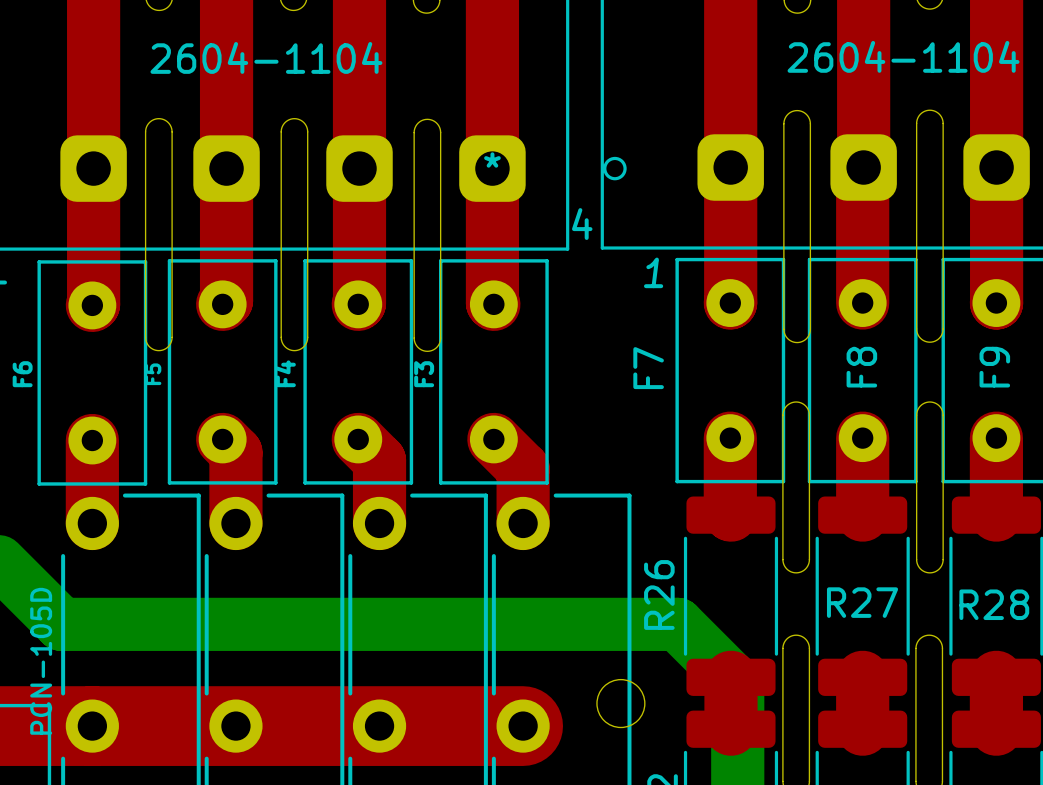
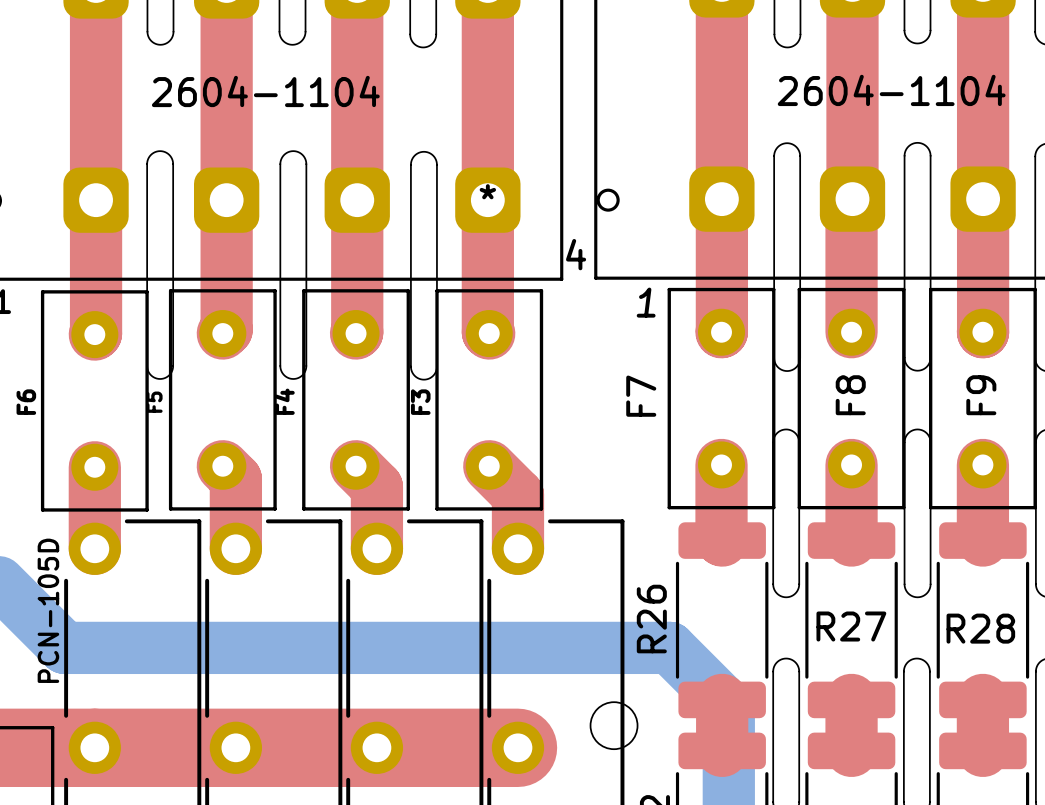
part value position: PCN-105D (41, 661) -> PCN-105D (48, 610)

